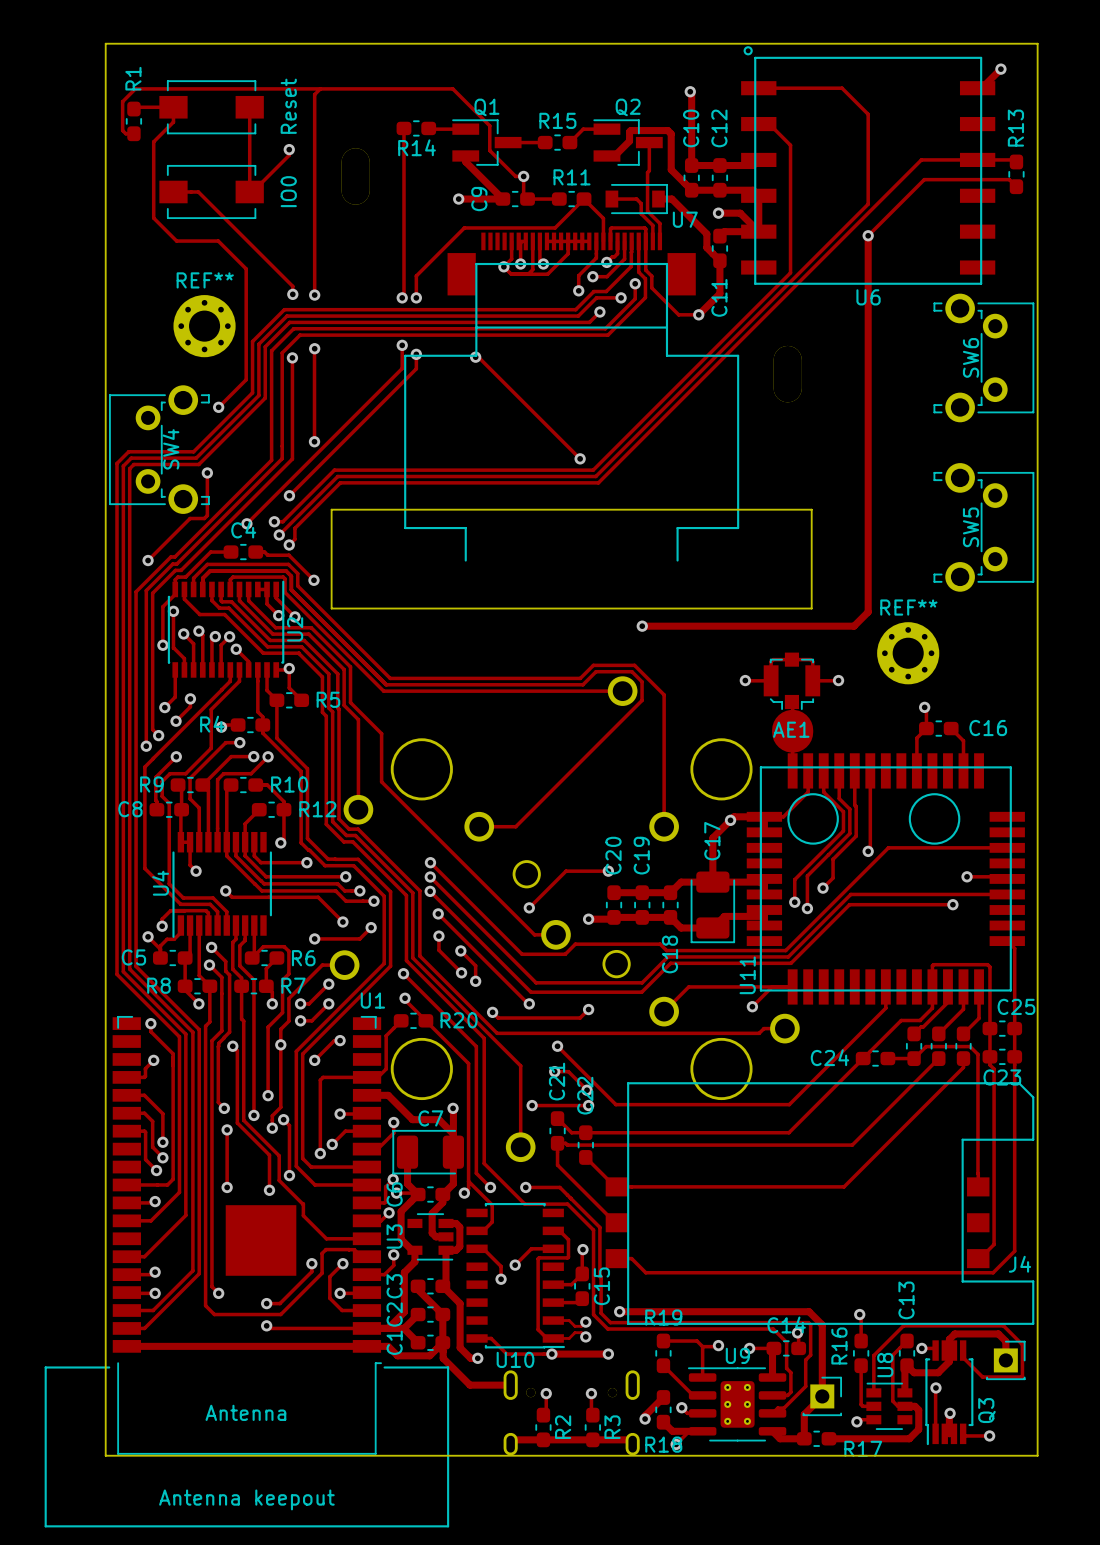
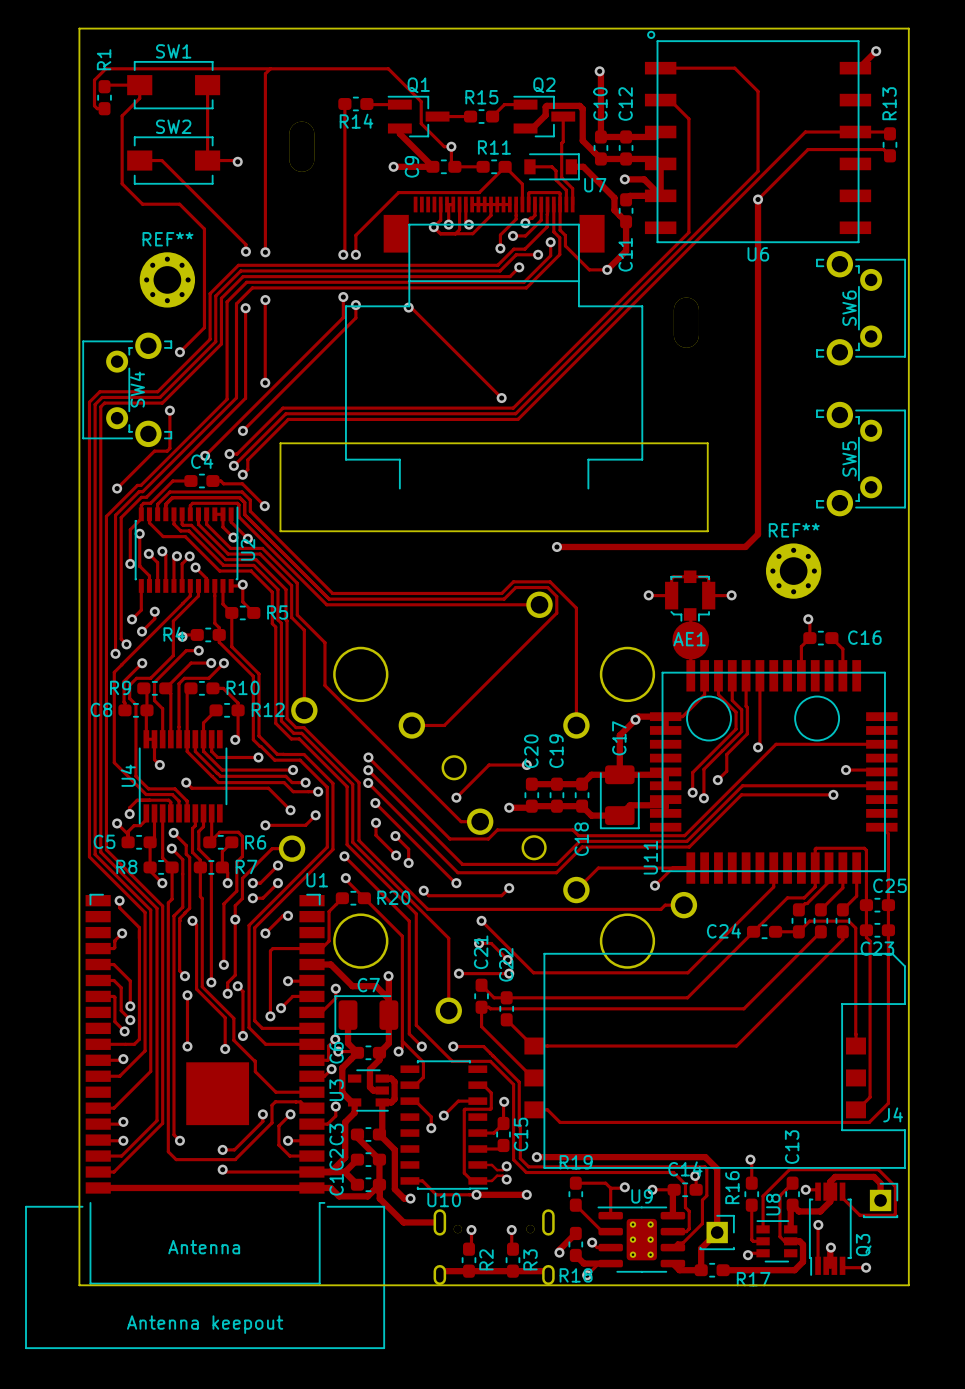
SW1 name: none -> SW1 (173, 51)
text: Reset (288, 106) -> none
track: (289, 149) (289, 155) (252, 191) -> (237, 161) (210, 160)
via position: (289, 149) -> (237, 161)
SW2 name: none -> SW2 (173, 126)
text: IO0 (288, 191) -> none

